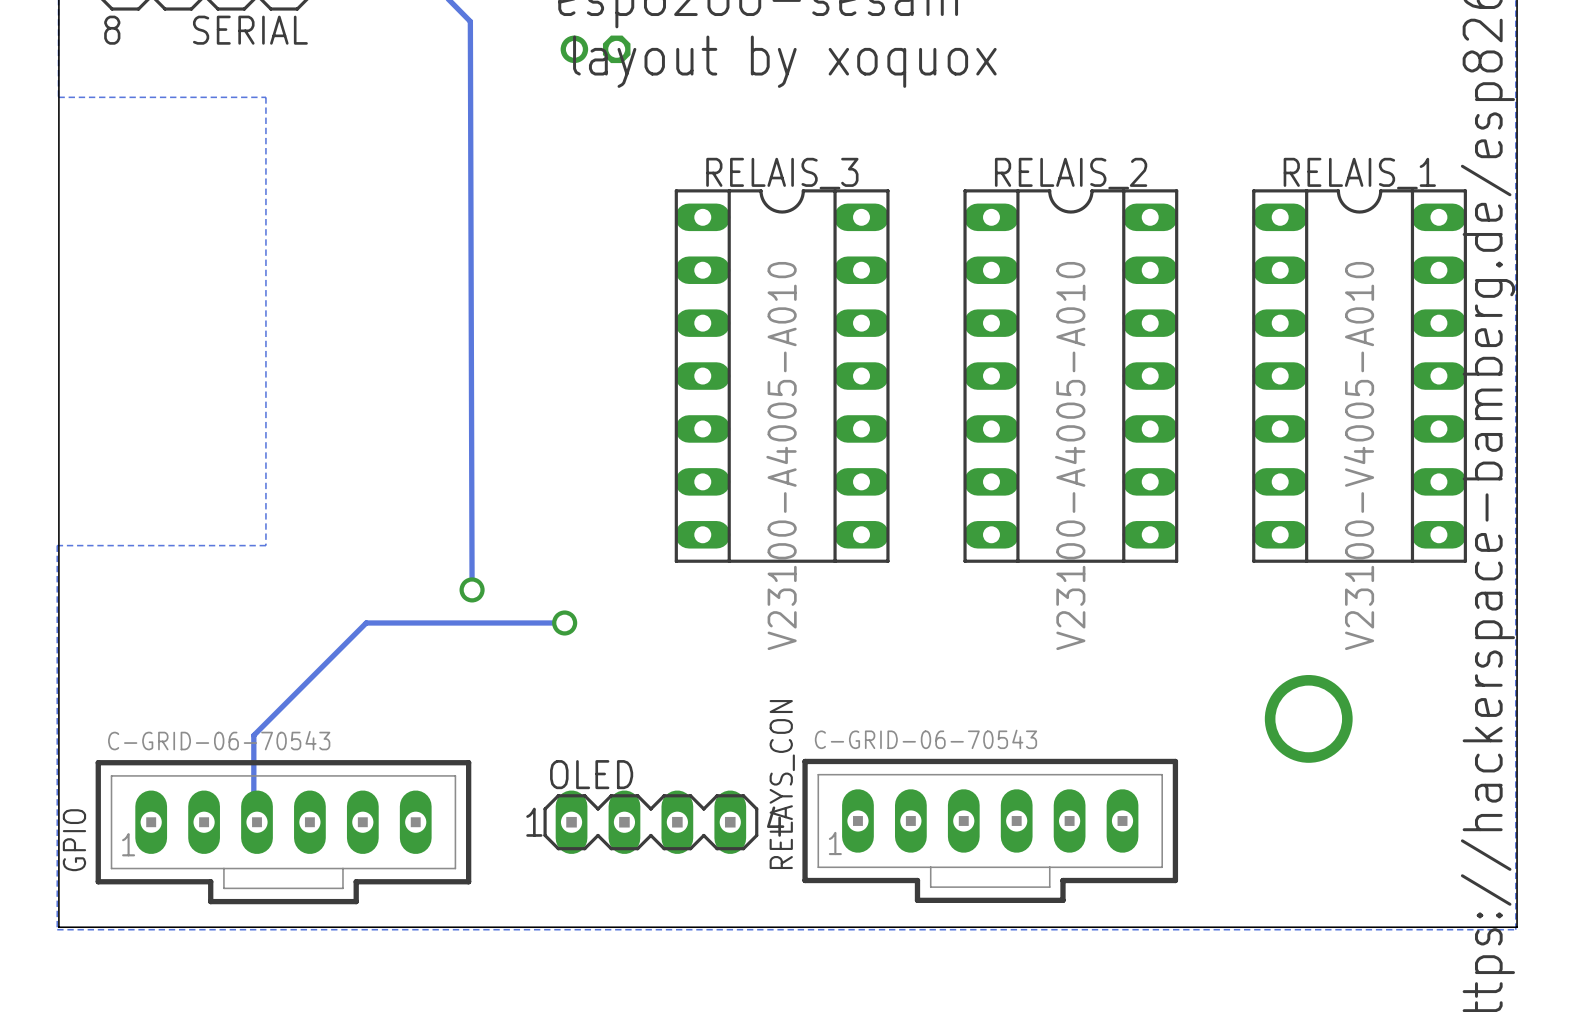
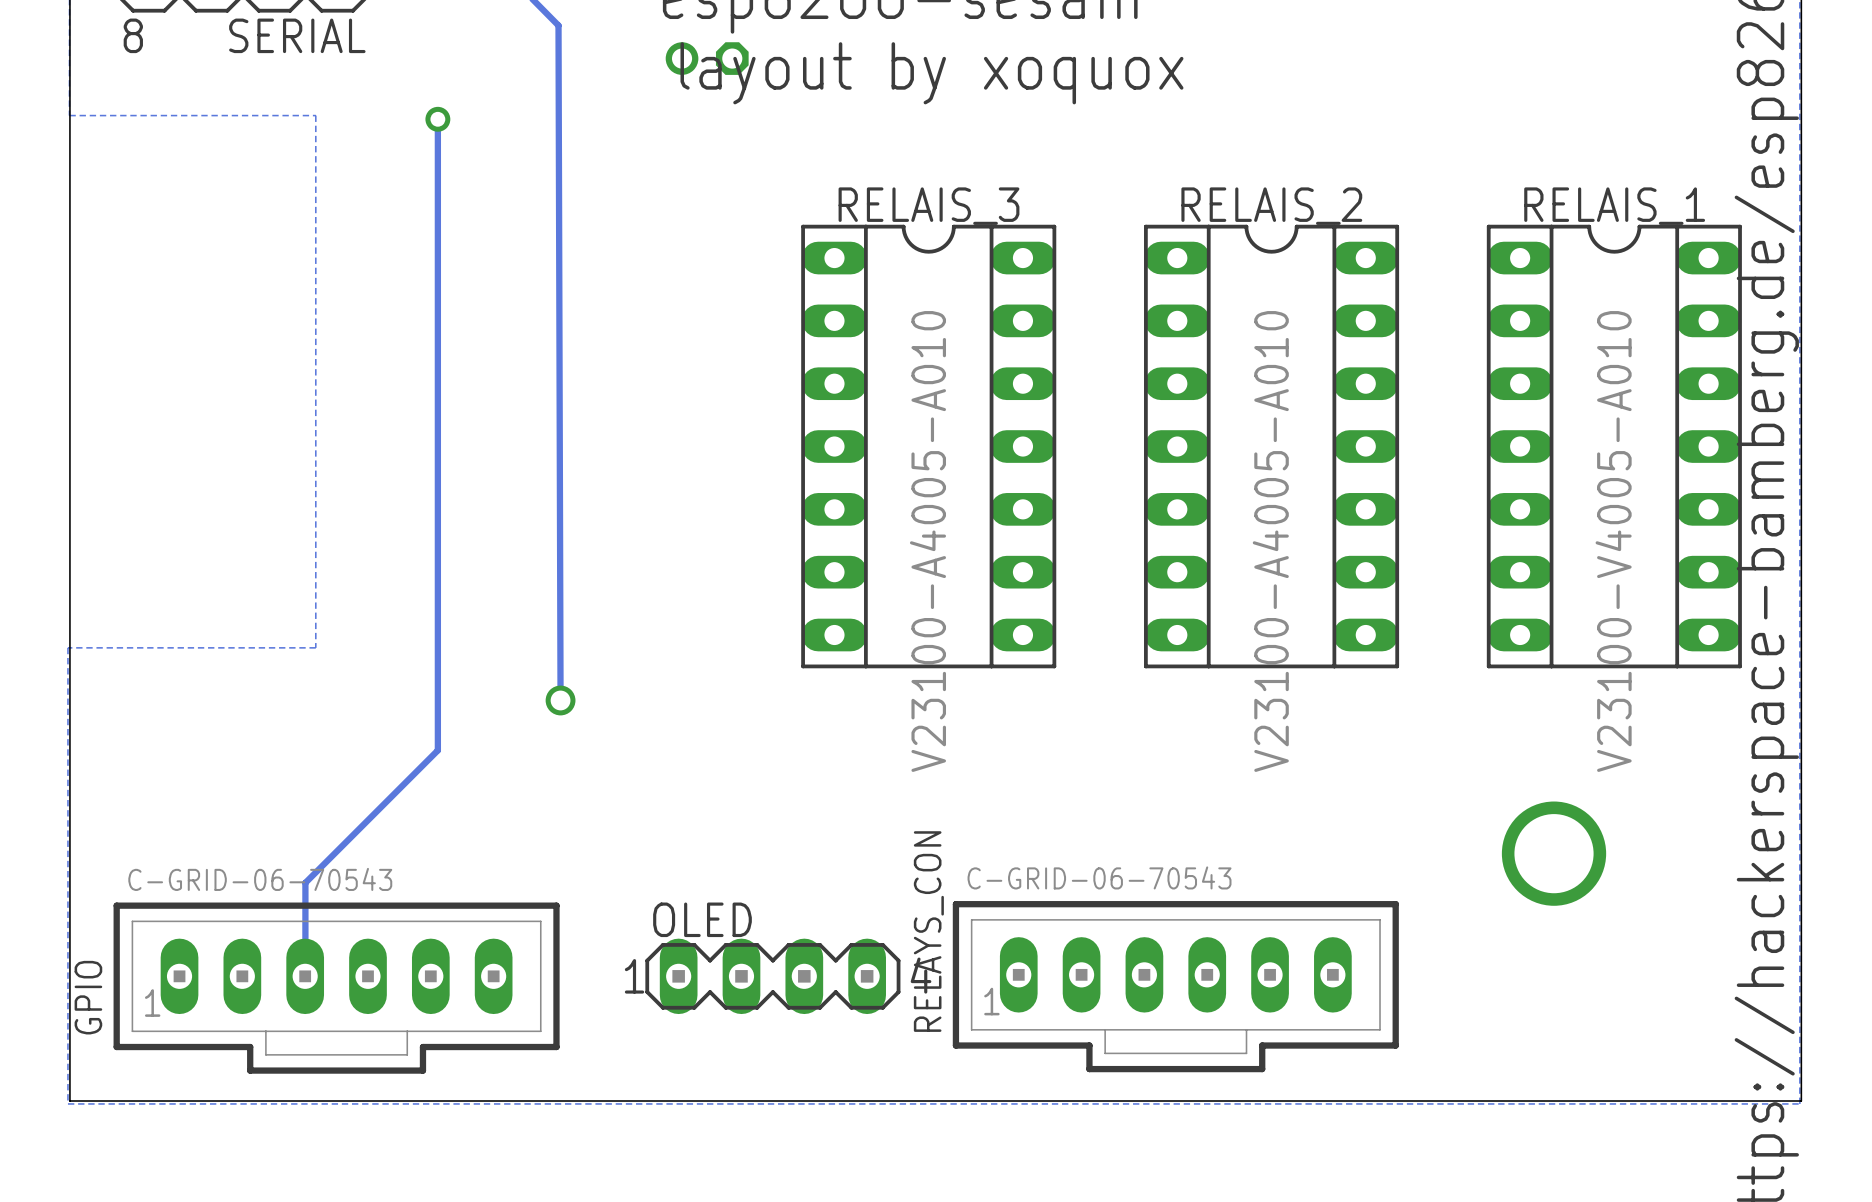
via: none -> (437, 119)
track: (564, 622) (366, 622) (253, 735) (253, 819) (257, 822) -> (437, 119) (437, 750) (305, 882) (305, 976)
via: (564, 622) -> none

